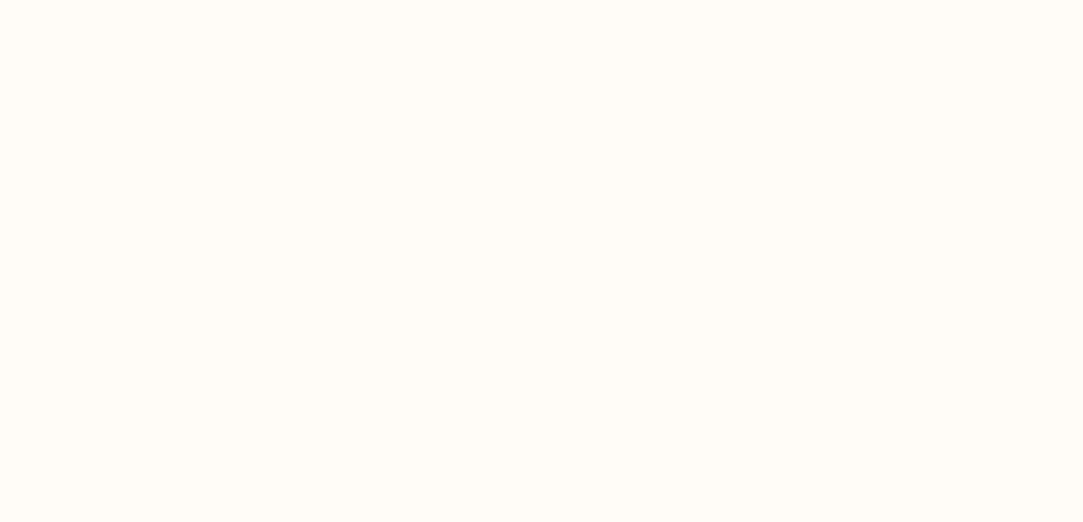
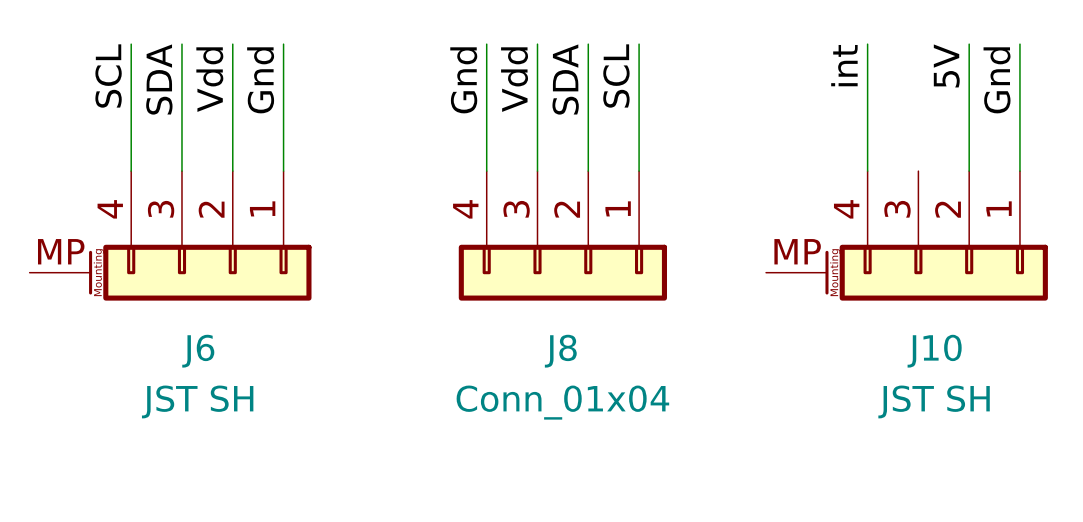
wire: none -> (131, 44) (131, 171)
wire: none -> (181, 44) (181, 171)
wire: none -> (232, 44) (232, 171)
wire: none -> (283, 44) (283, 171)
wire: none -> (486, 44) (486, 171)
wire: none -> (537, 44) (537, 171)
wire: none -> (588, 44) (588, 171)
wire: none -> (639, 44) (639, 171)
wire: none -> (867, 44) (867, 171)
wire: none -> (969, 44) (969, 171)
wire: none -> (1019, 44) (1019, 171)
label: none -> 5V (946, 65)
label: none -> int (844, 65)
label: none -> SCL (108, 76)
label: none -> SDA (159, 79)
label: none -> SDA (565, 79)
label: none -> SCL (616, 76)
label: none -> Vdd (209, 79)
label: none -> Vdd (514, 79)
label: none -> Gnd (260, 80)
label: none -> Gnd (463, 80)
label: none -> Gnd (997, 80)
J6: none -> JST SH (170, 235)
J8: none -> Conn_01x04 (562, 235)
J10: none -> JST SH (906, 235)

